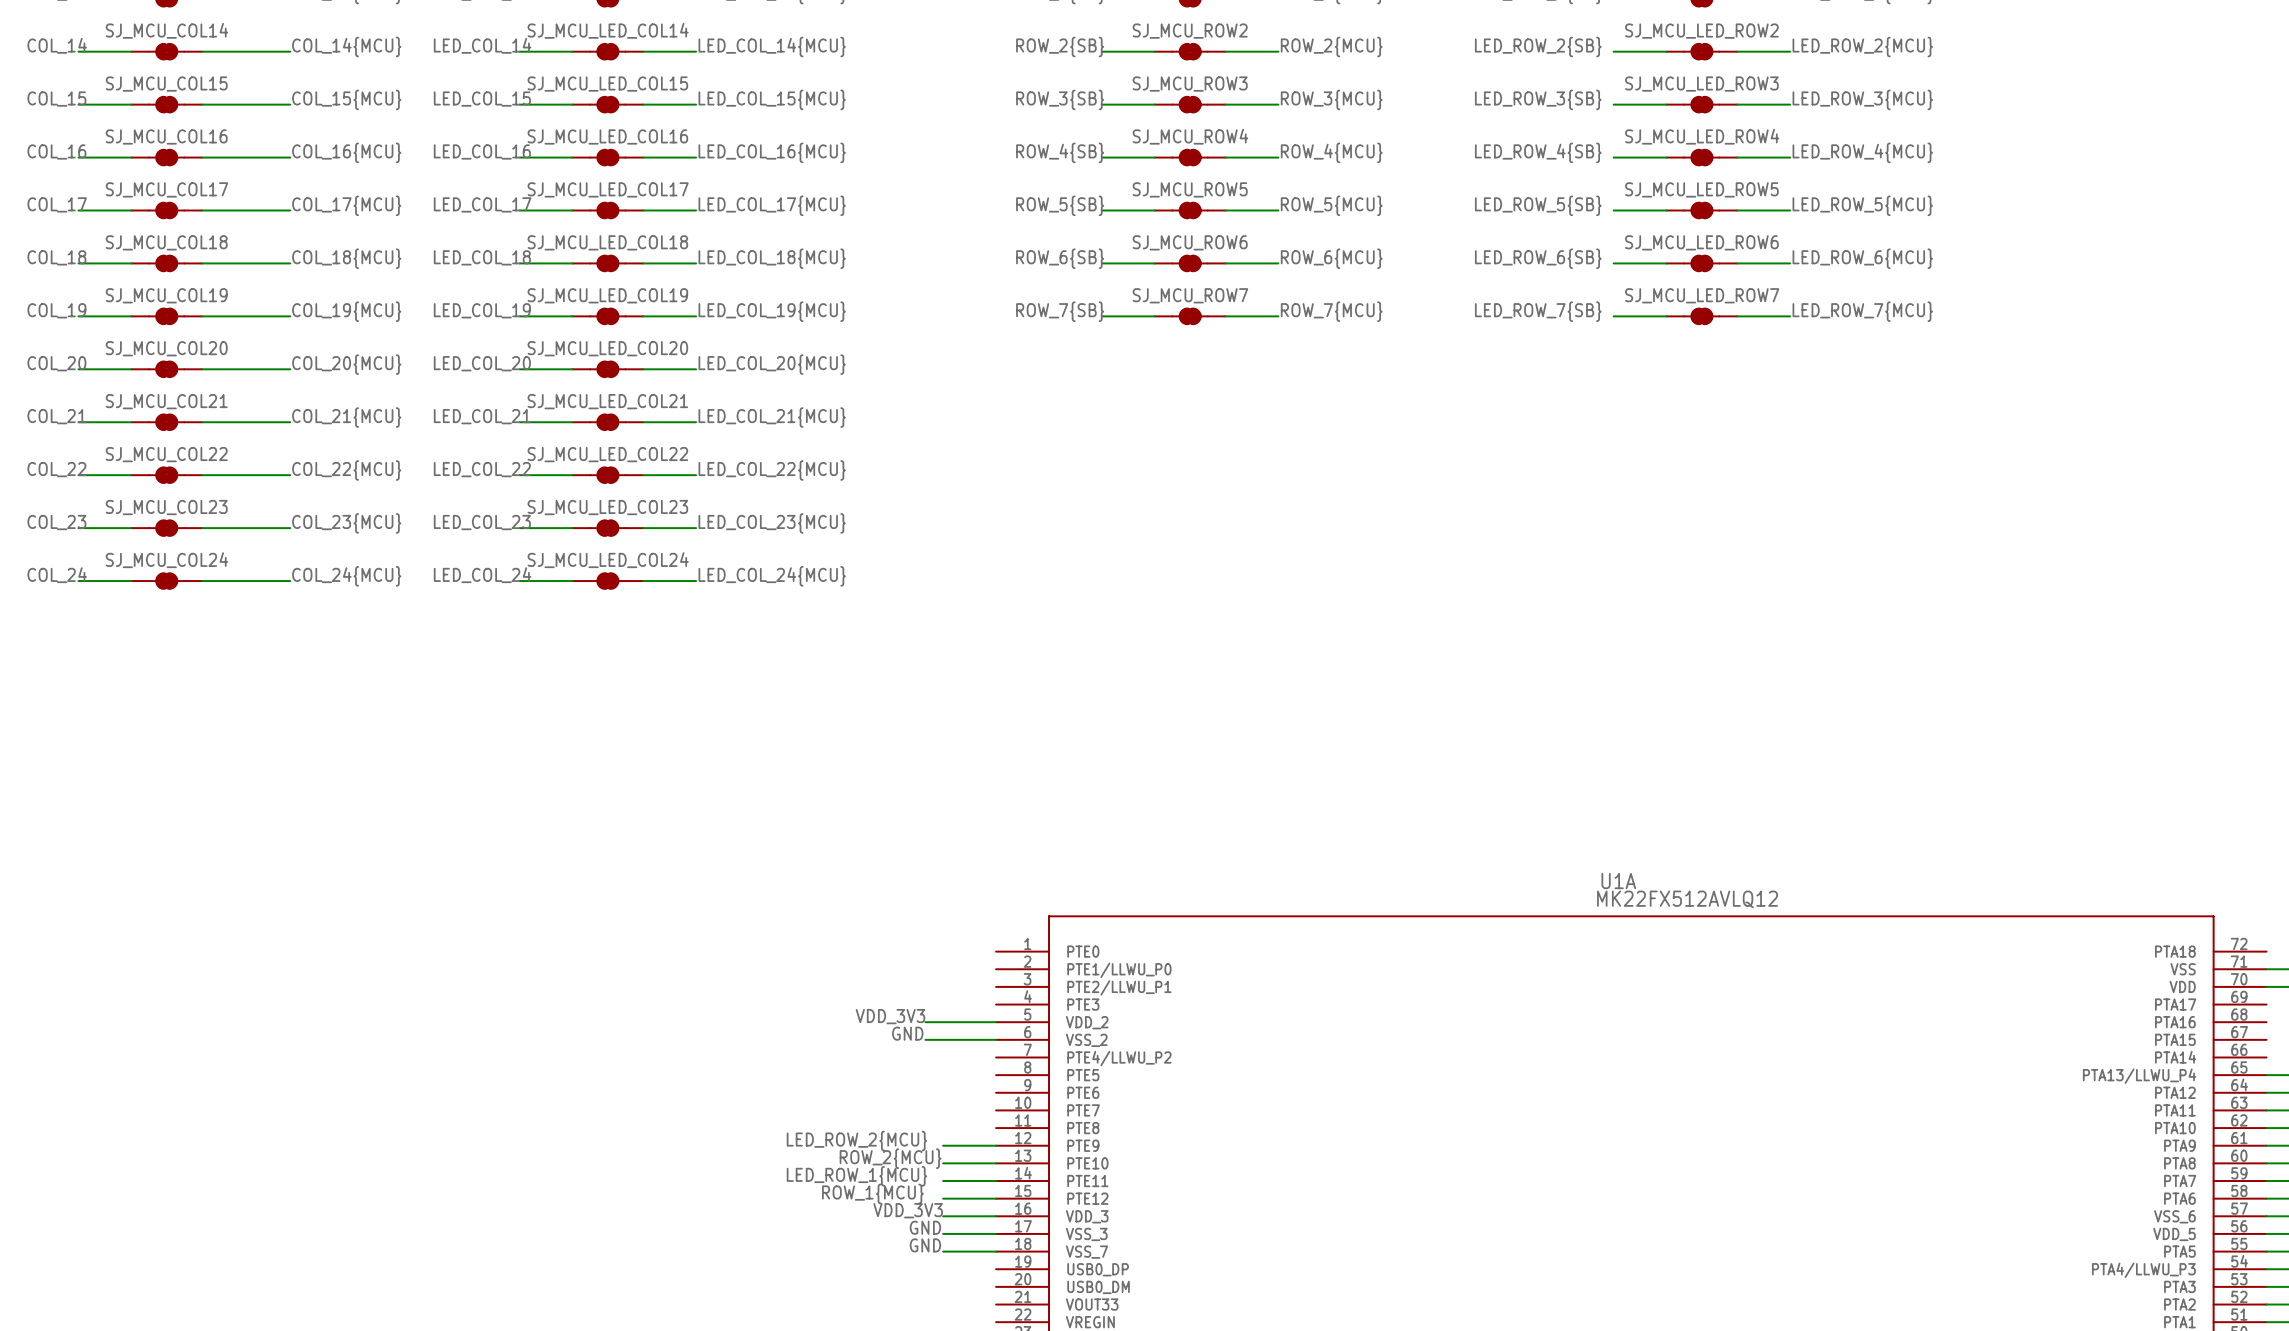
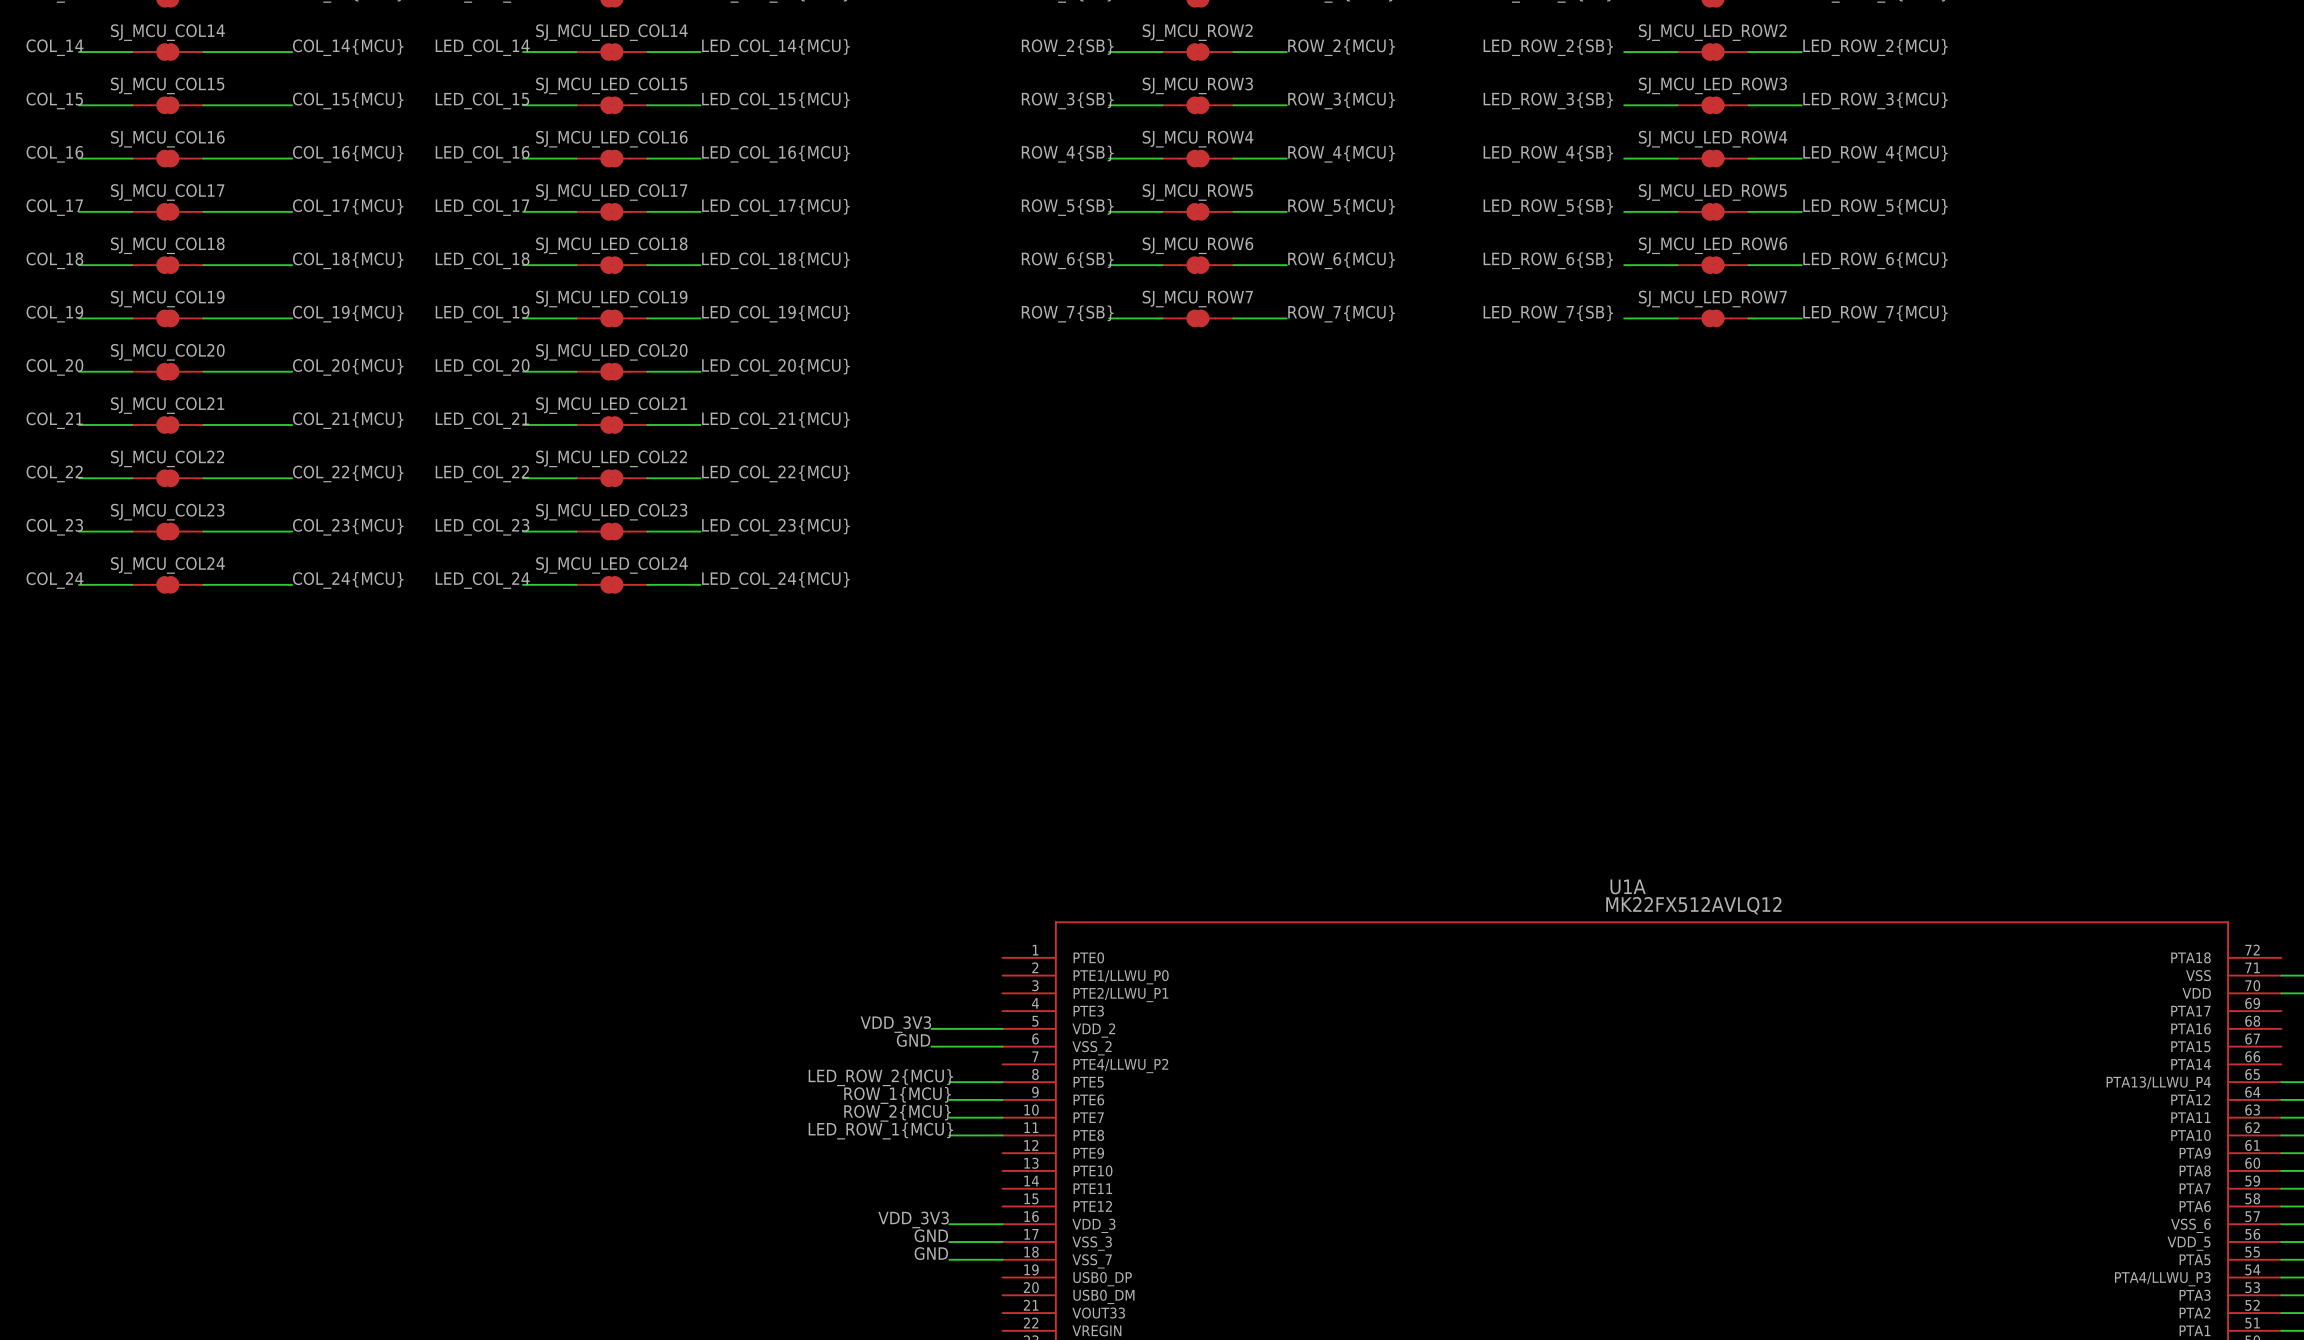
label position: LED_ROW_2{MCU} (856, 1141) -> LED_ROW_2{MCU} (880, 1077)
wire: (943, 1145) (996, 1145) -> (949, 1082) (1002, 1082)
label position: ROW_2{MCU} (890, 1158) -> ROW_2{MCU} (897, 1113)
wire: (943, 1163) (996, 1163) -> (949, 1099) (1002, 1099)
label position: LED_ROW_1{MCU} (856, 1176) -> LED_ROW_1{MCU} (880, 1130)
wire: (943, 1181) (996, 1181) -> (949, 1117) (1002, 1117)
label position: ROW_1{MCU} (872, 1193) -> ROW_1{MCU} (897, 1095)
wire: (943, 1198) (996, 1198) -> (949, 1135) (1002, 1135)

